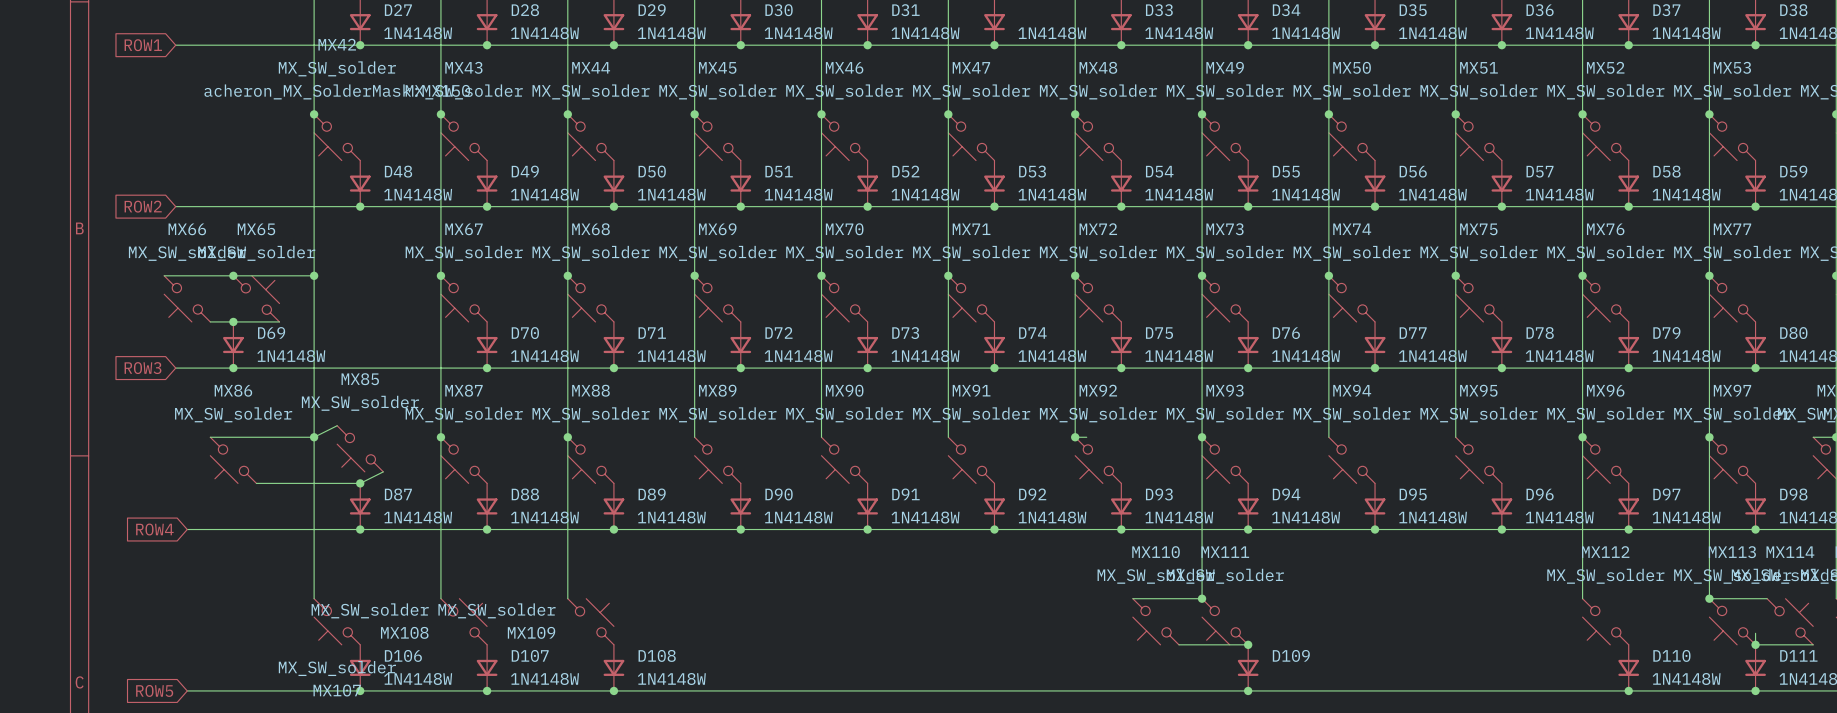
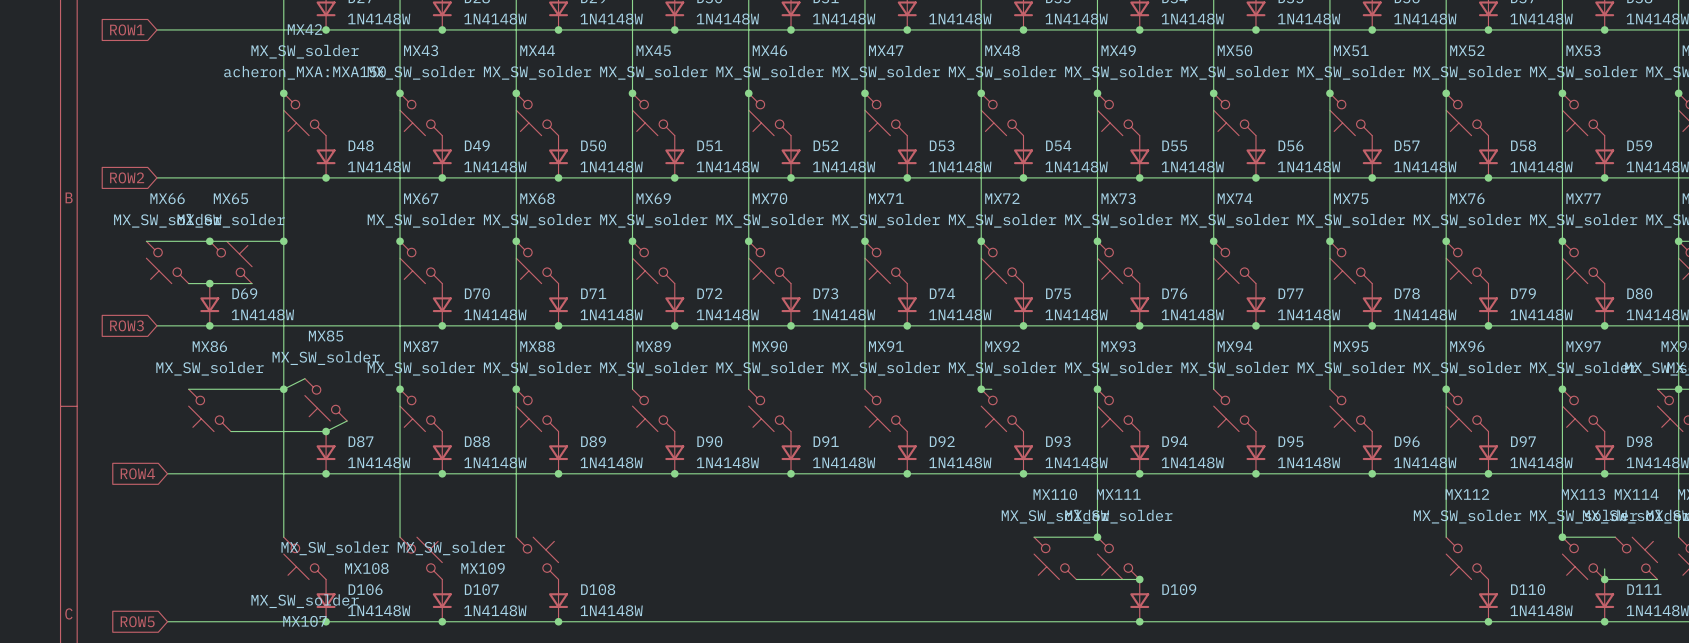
MX42 text: acheron_MX_SolderMask:MX150 (337, 91) -> acheron_MXA:MXA150 (304, 72)

